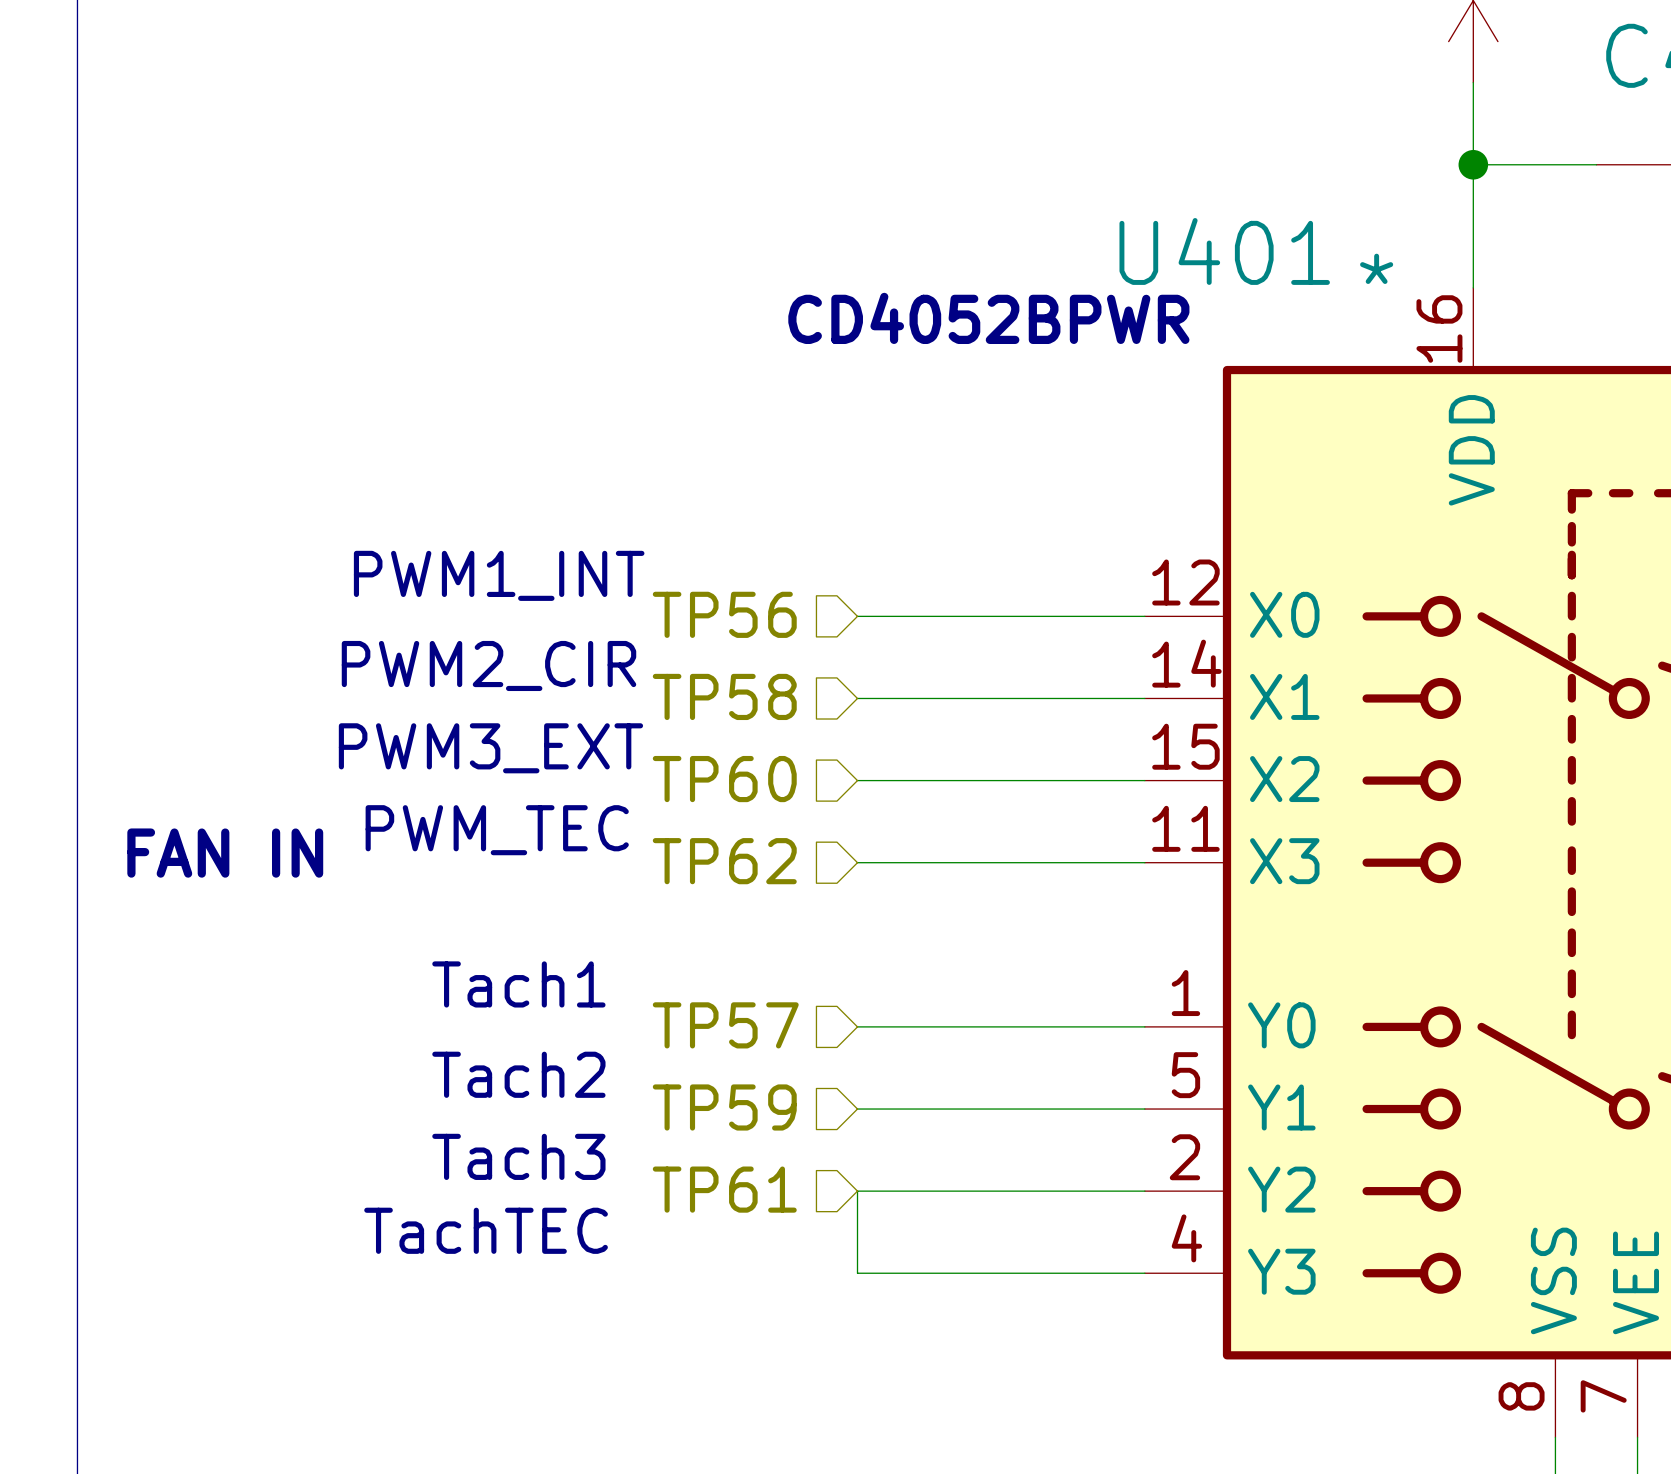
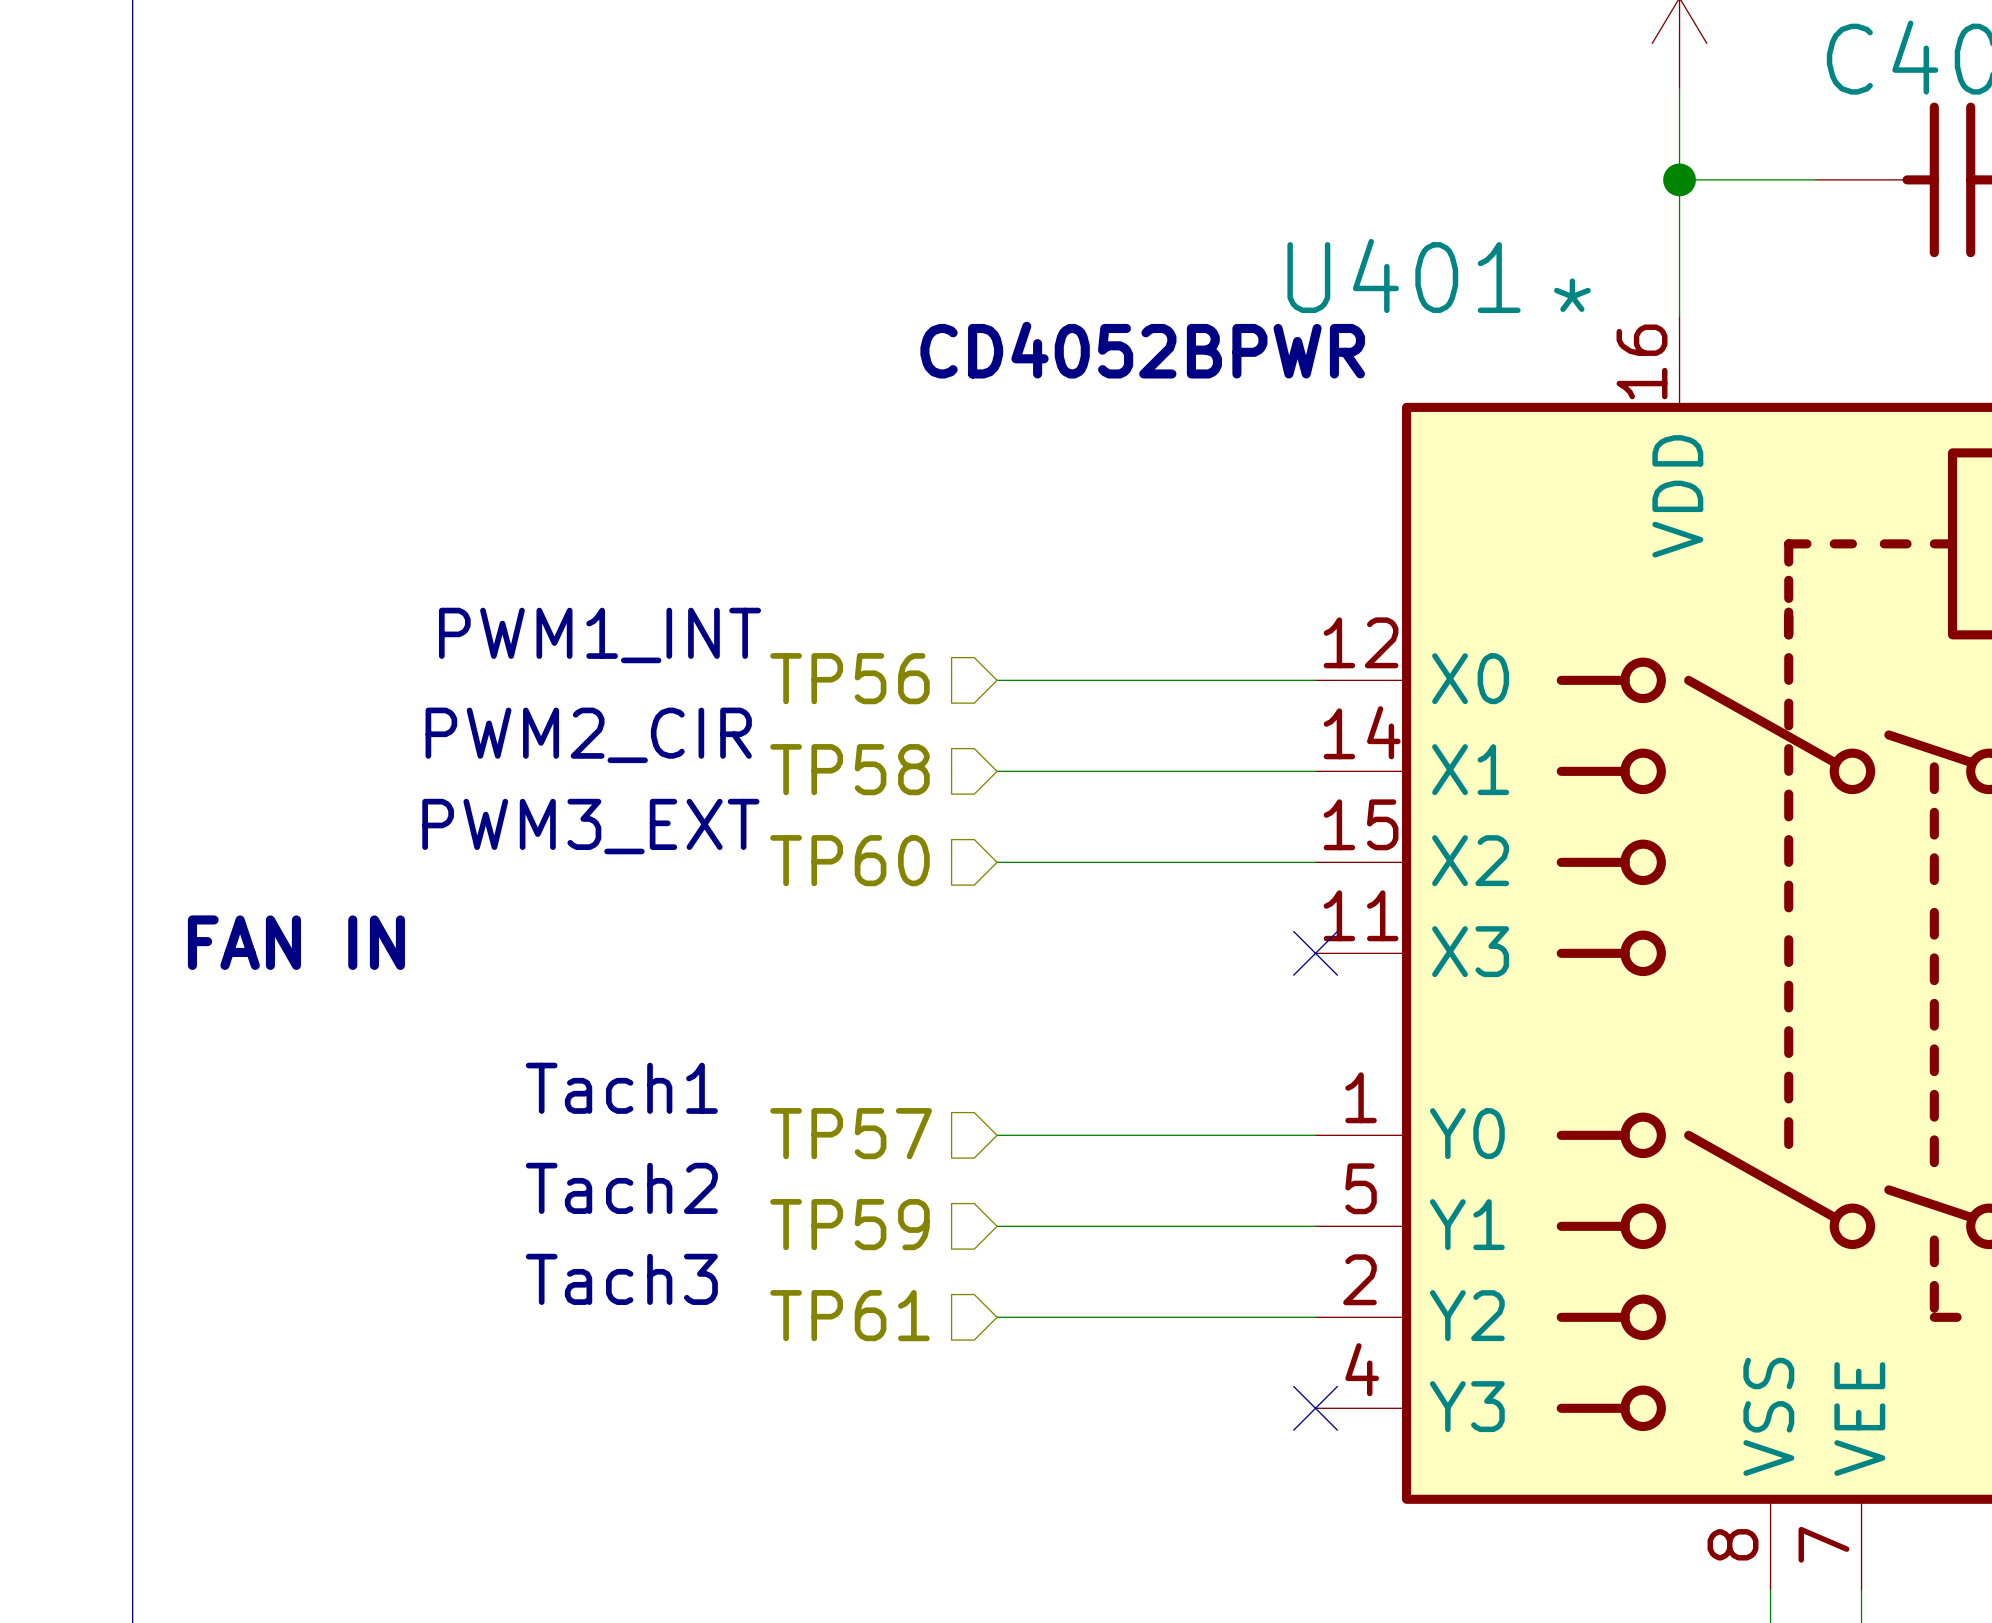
text: PWM_TEC (497, 830) -> none
hierarchical label: TP62 (724, 861) -> none
wire: (857, 862) (1144, 862) -> none
no-connect mark: none -> (1315, 953)
wire: (857, 1191) (857, 1273) (1144, 1273) -> none
text: TachTEC (486, 1230) -> none
no-connect mark: none -> (1315, 1408)

